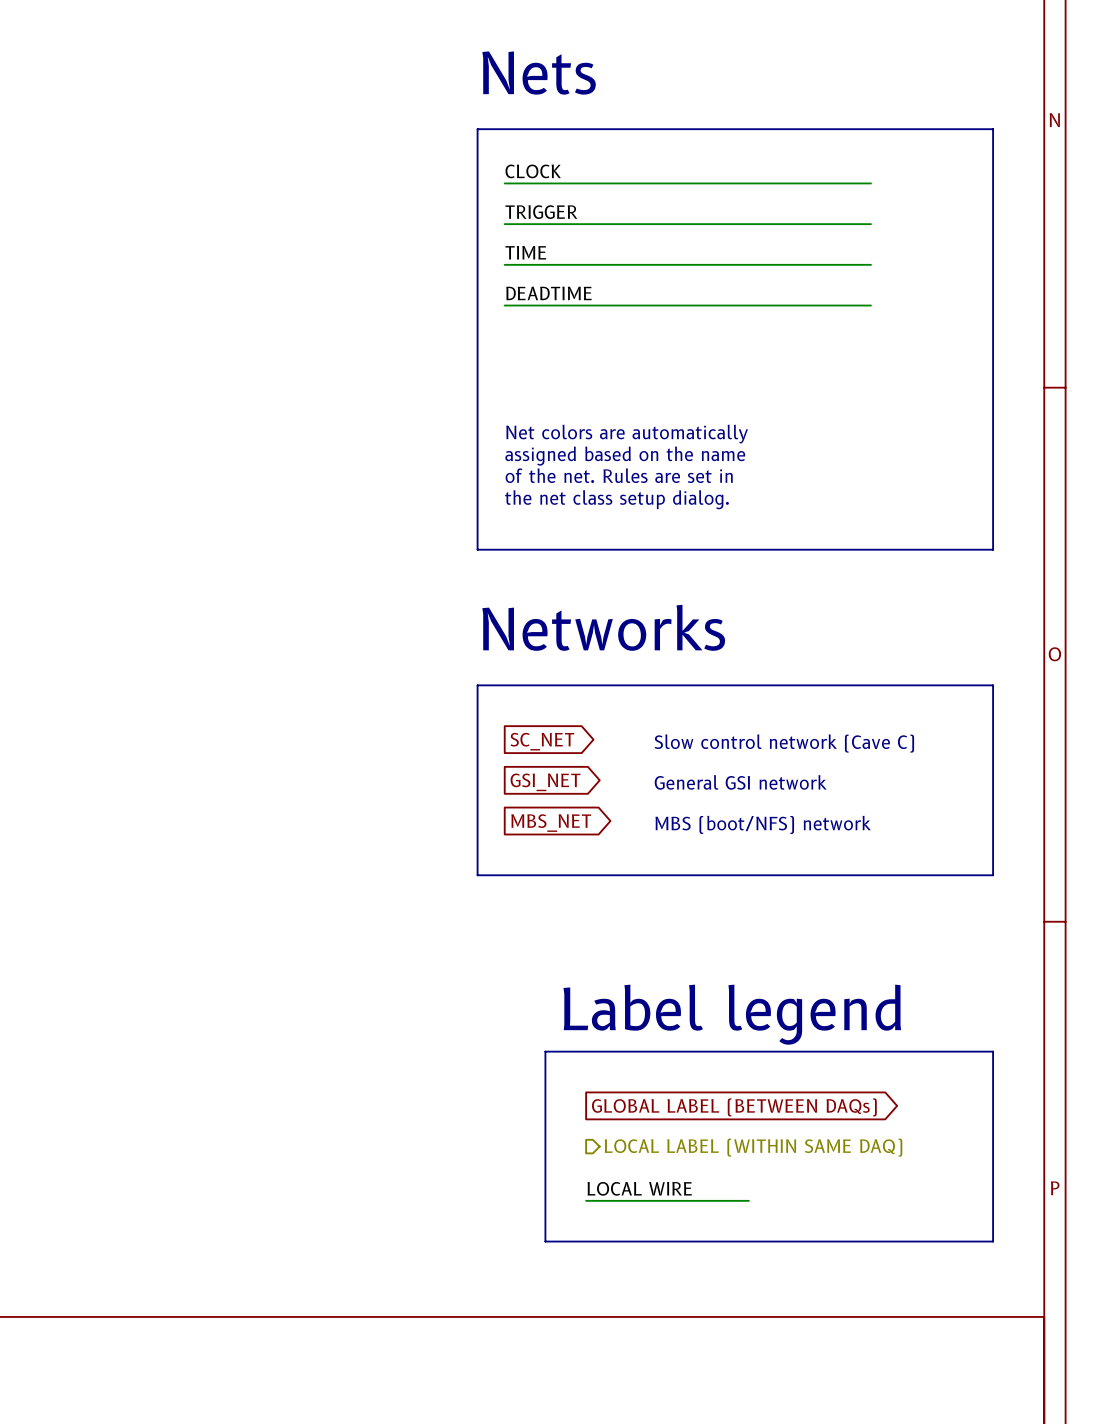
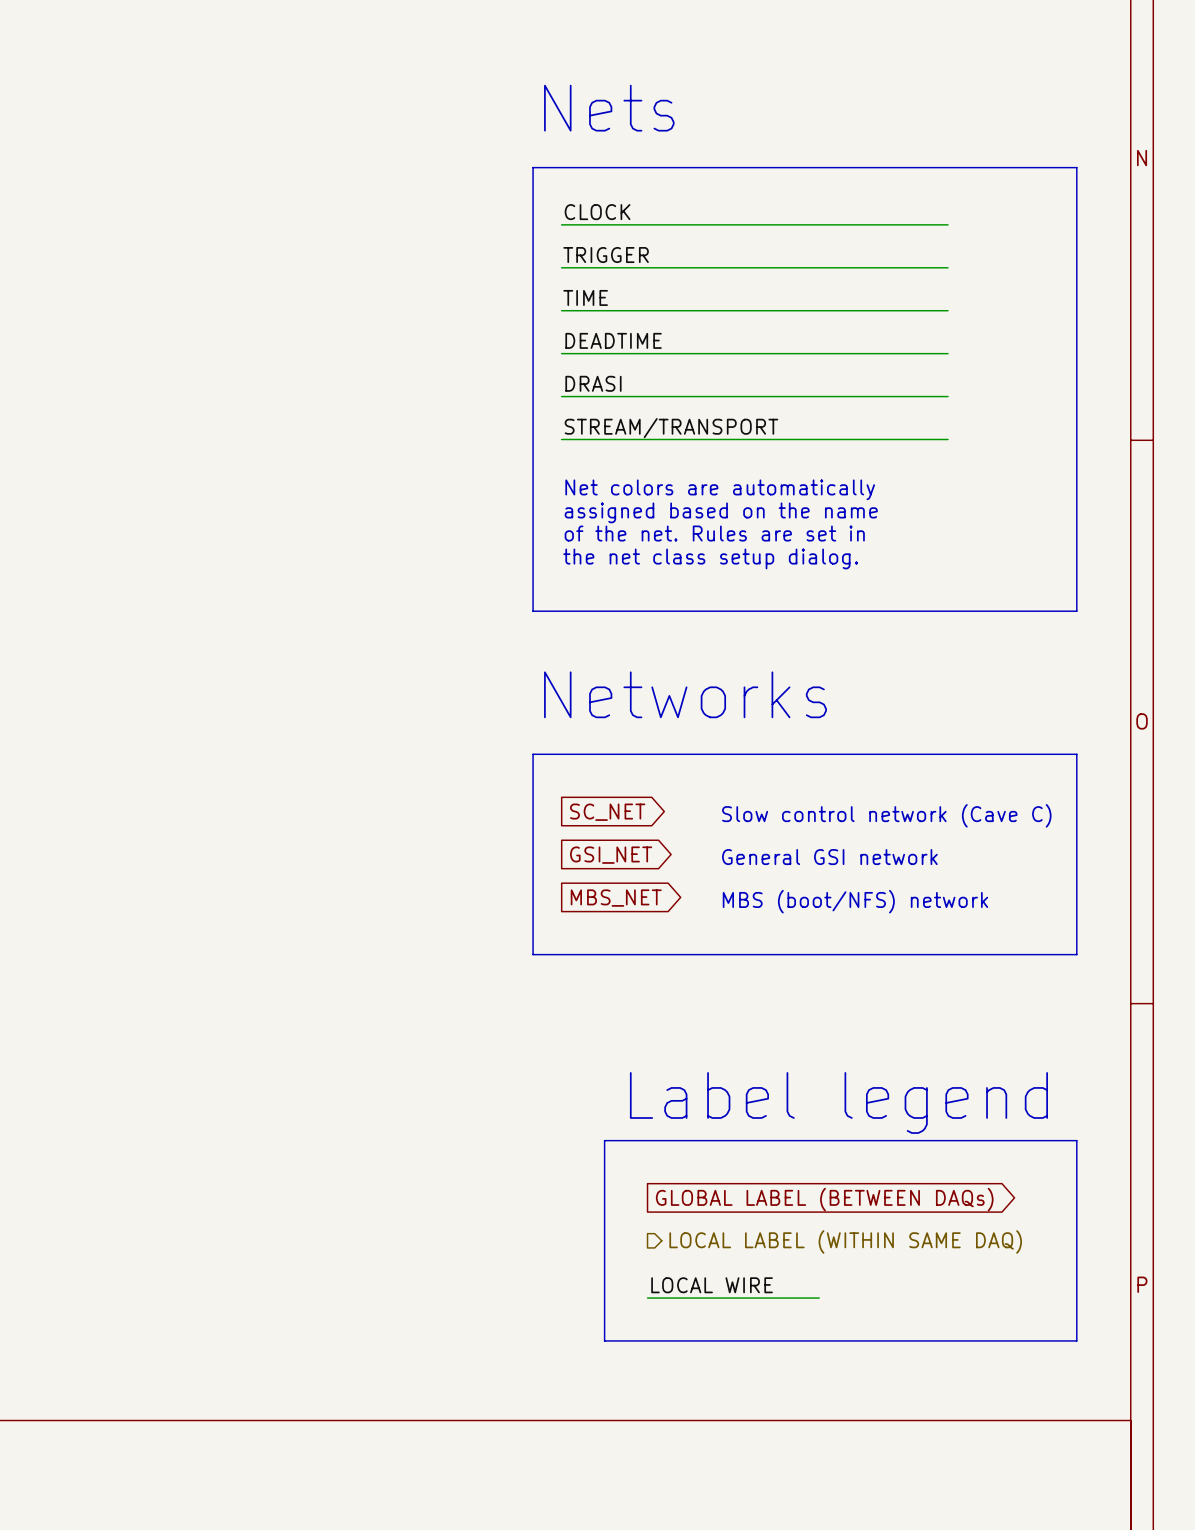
label: none -> DRASI (593, 383)
wire: none -> (561, 396) (948, 396)
label: none -> STREAM/TRANSPORT (671, 428)
wire: none -> (561, 439) (948, 439)

